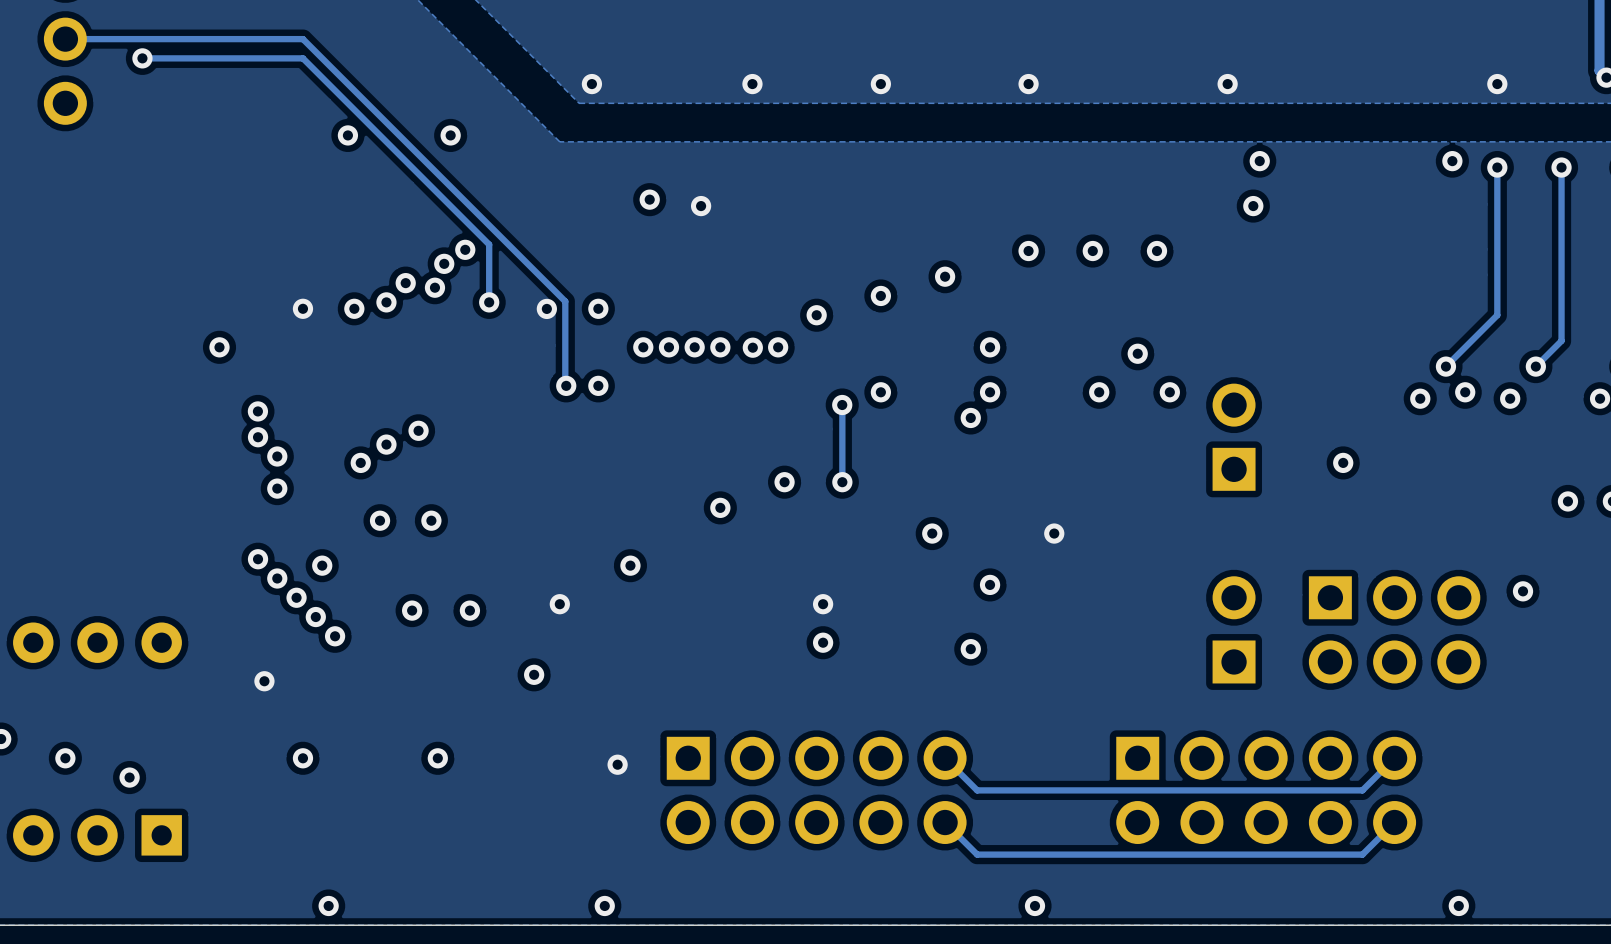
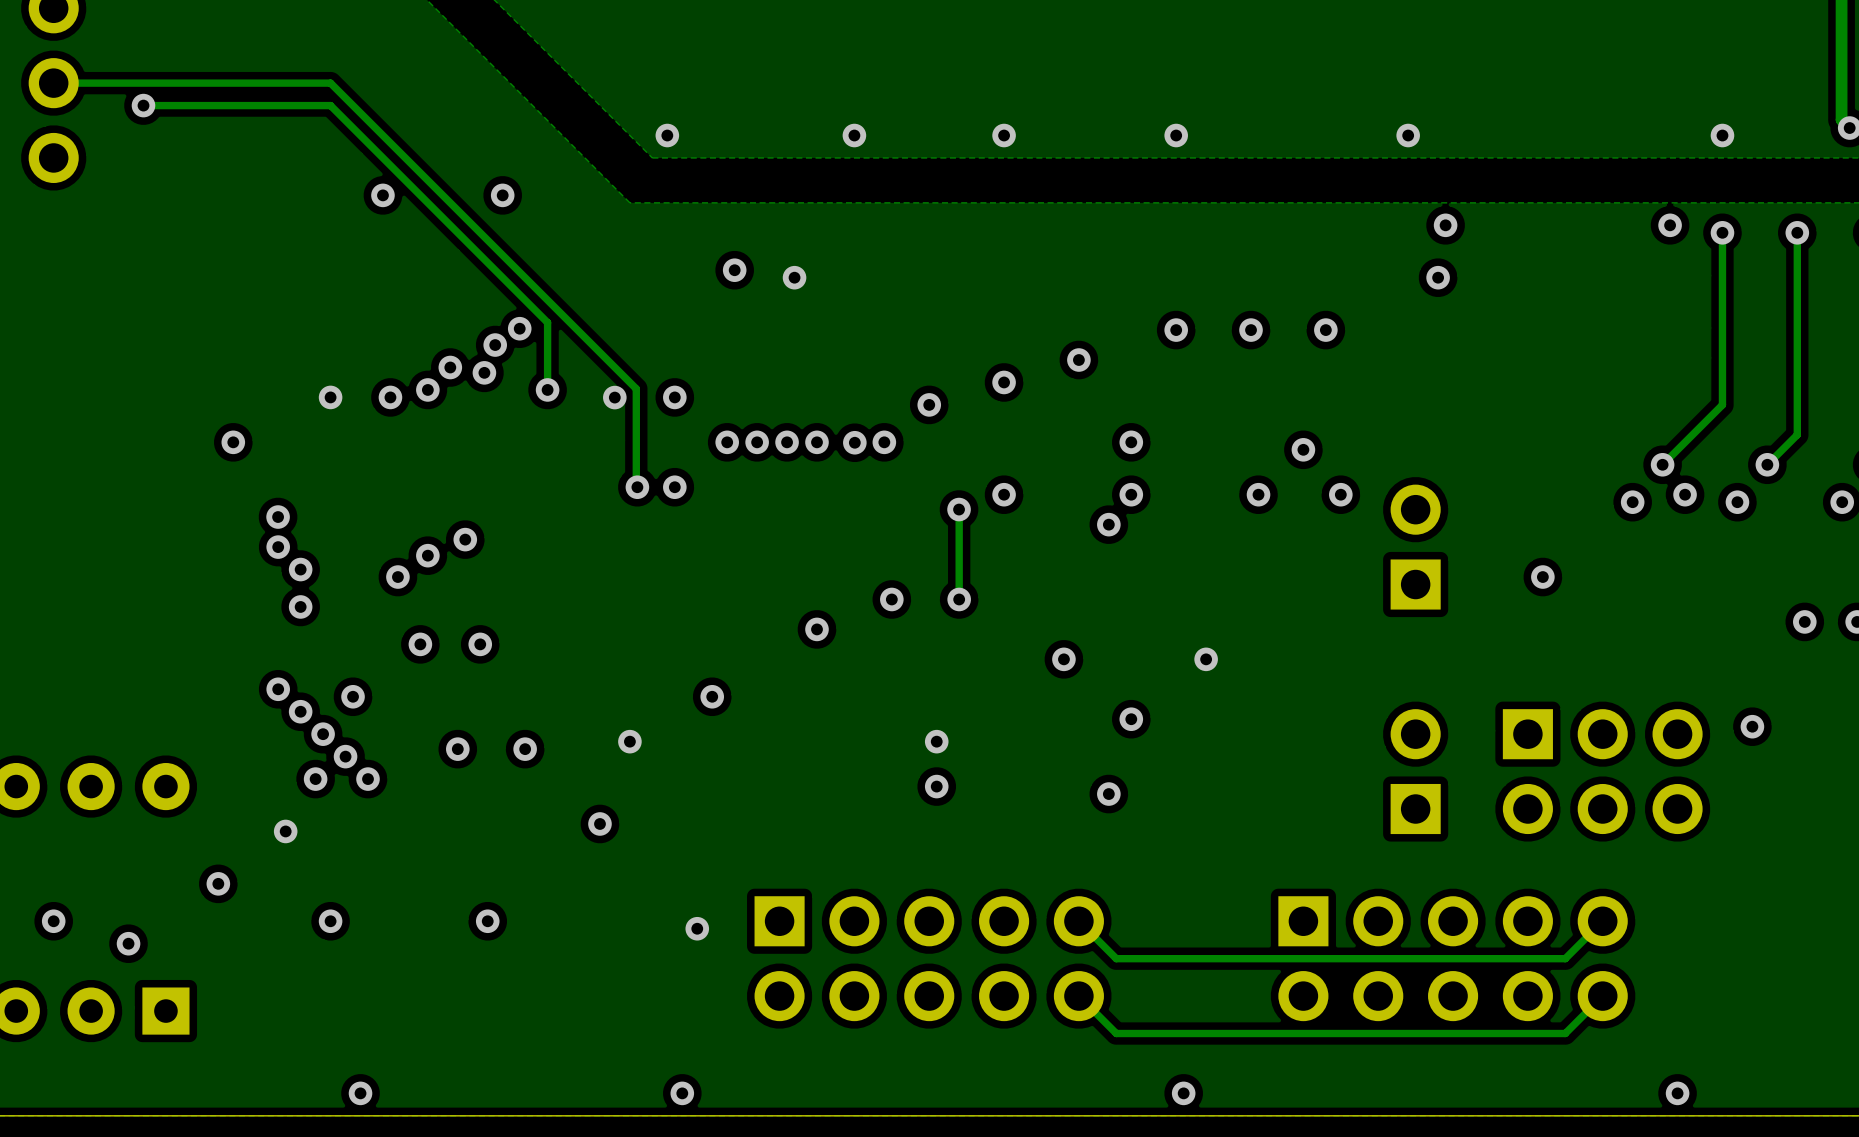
via: none -> (315, 779)
via: none -> (218, 883)

